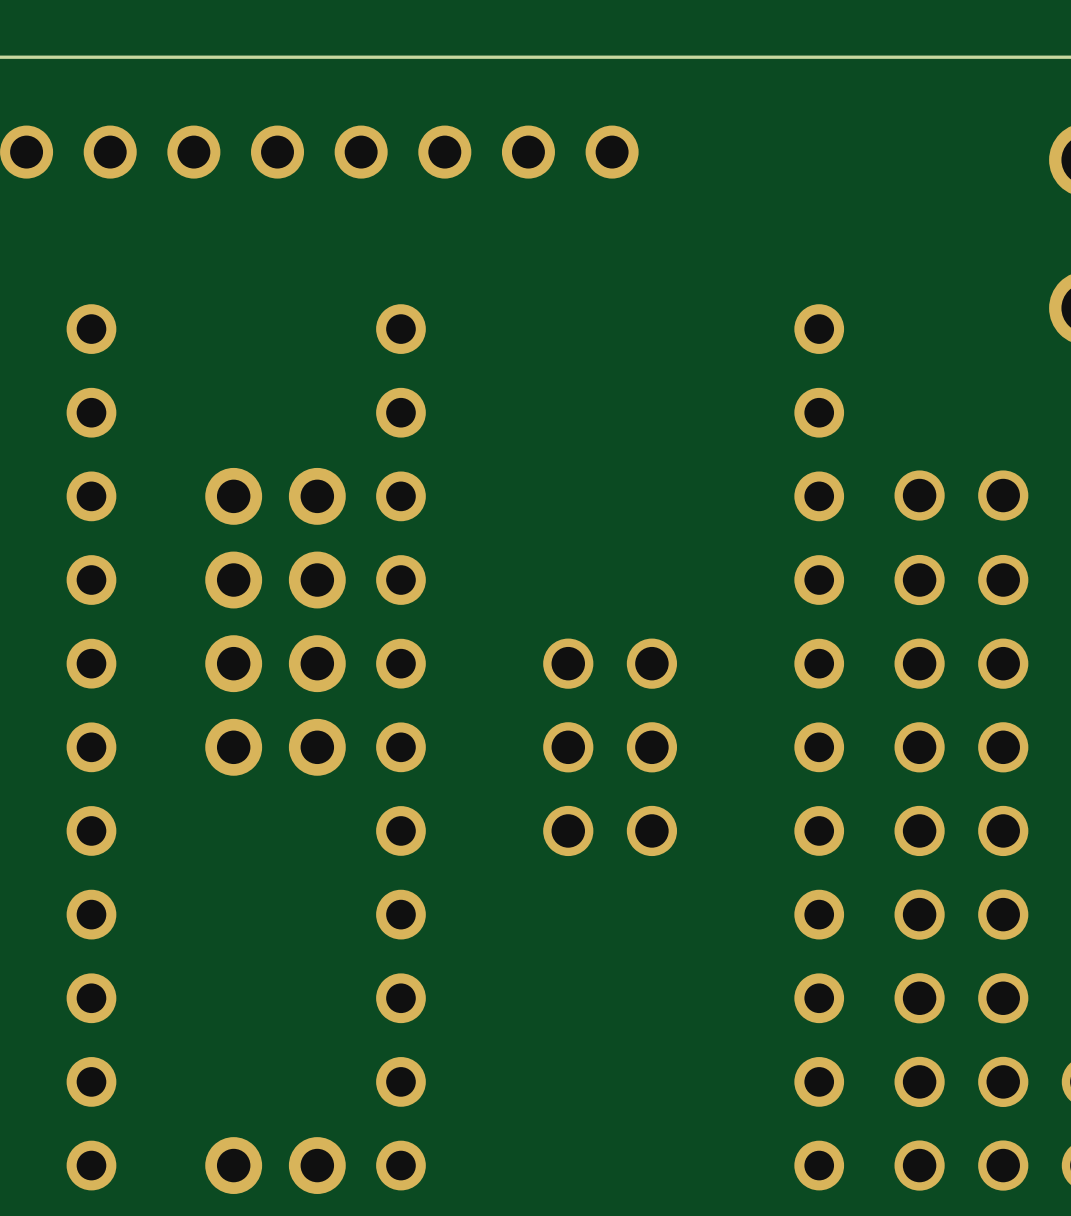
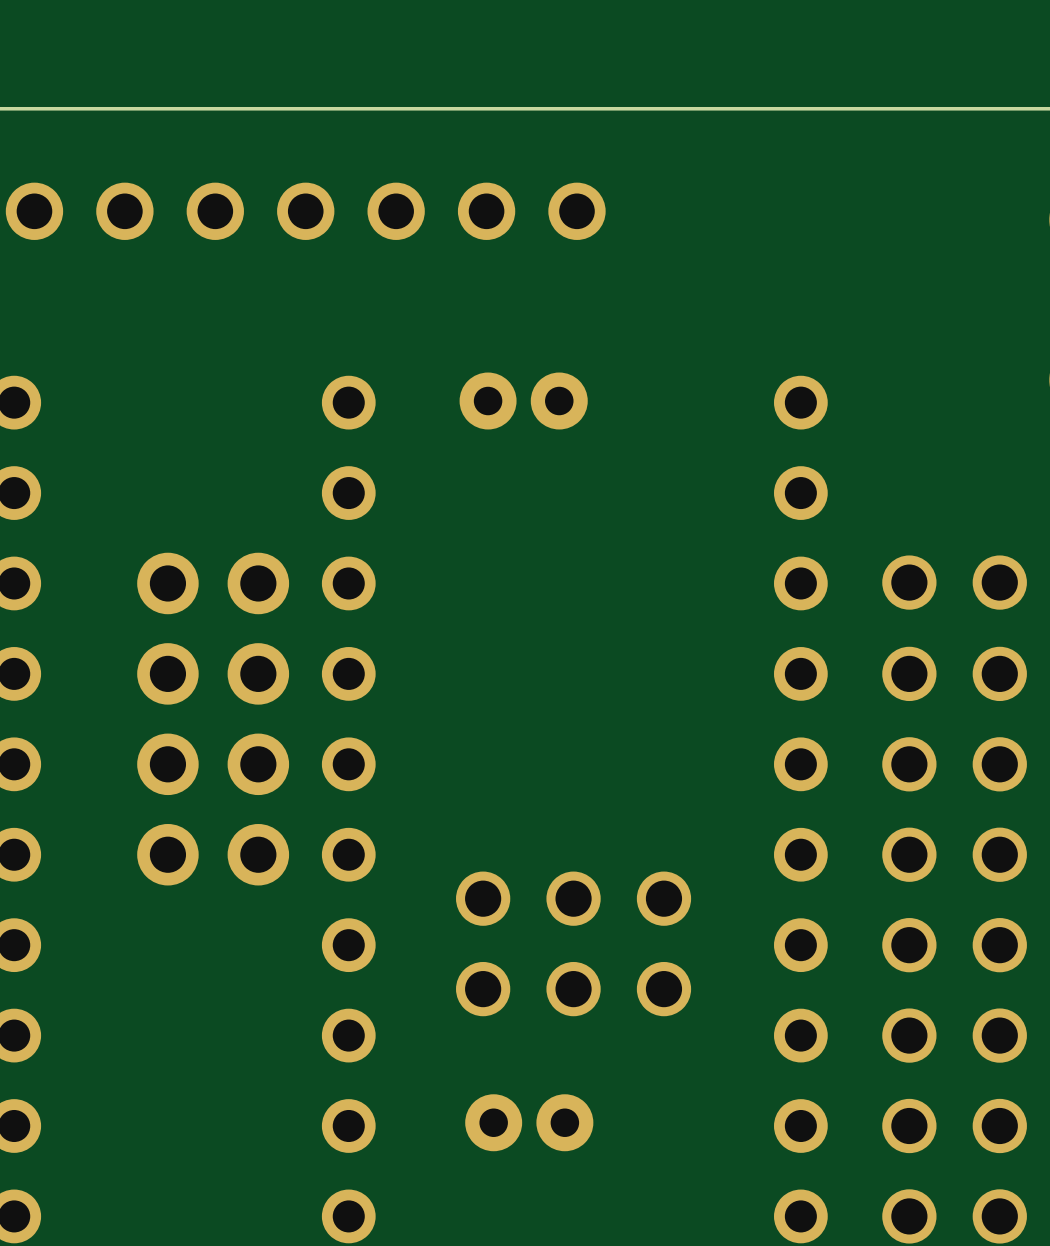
part: none -> (523, 401)
part: (610, 663) -> none
part: (610, 747) -> none
part: none -> (483, 943)
part: none -> (663, 943)
part rotation: 0° (610, 830) -> 90° clockwise (573, 943)
part: none -> (529, 1122)

